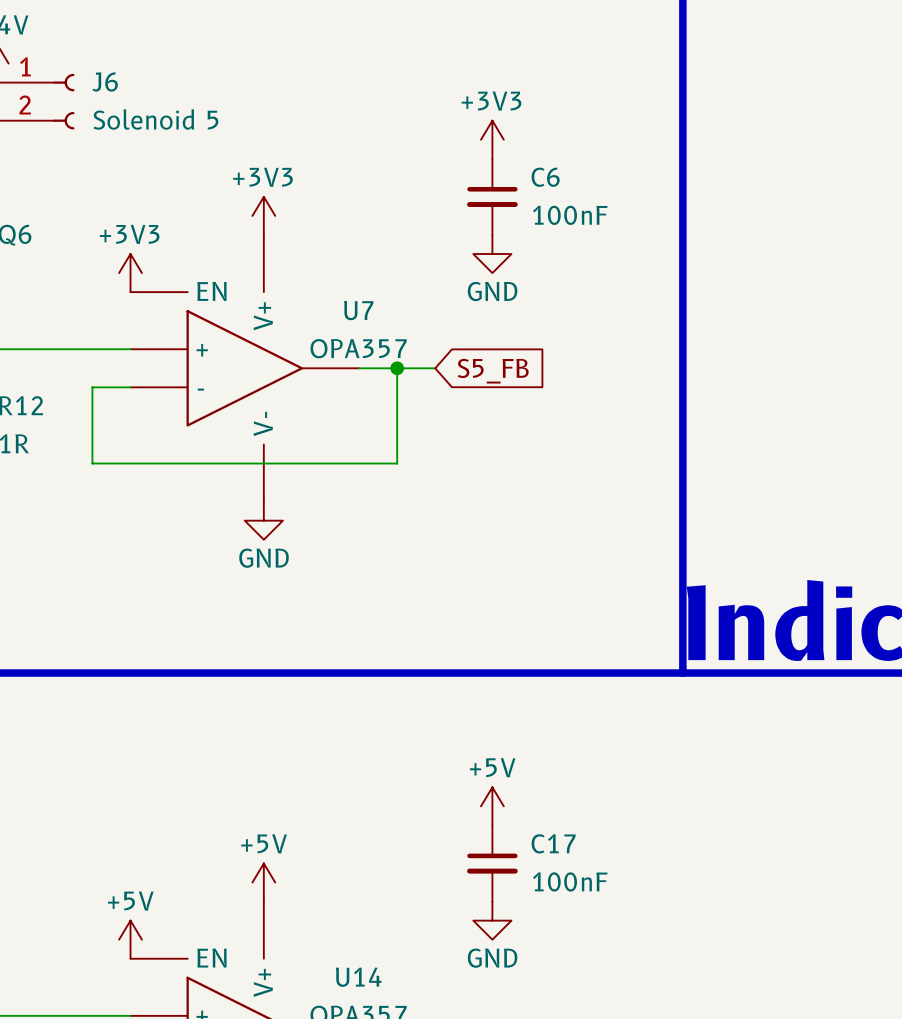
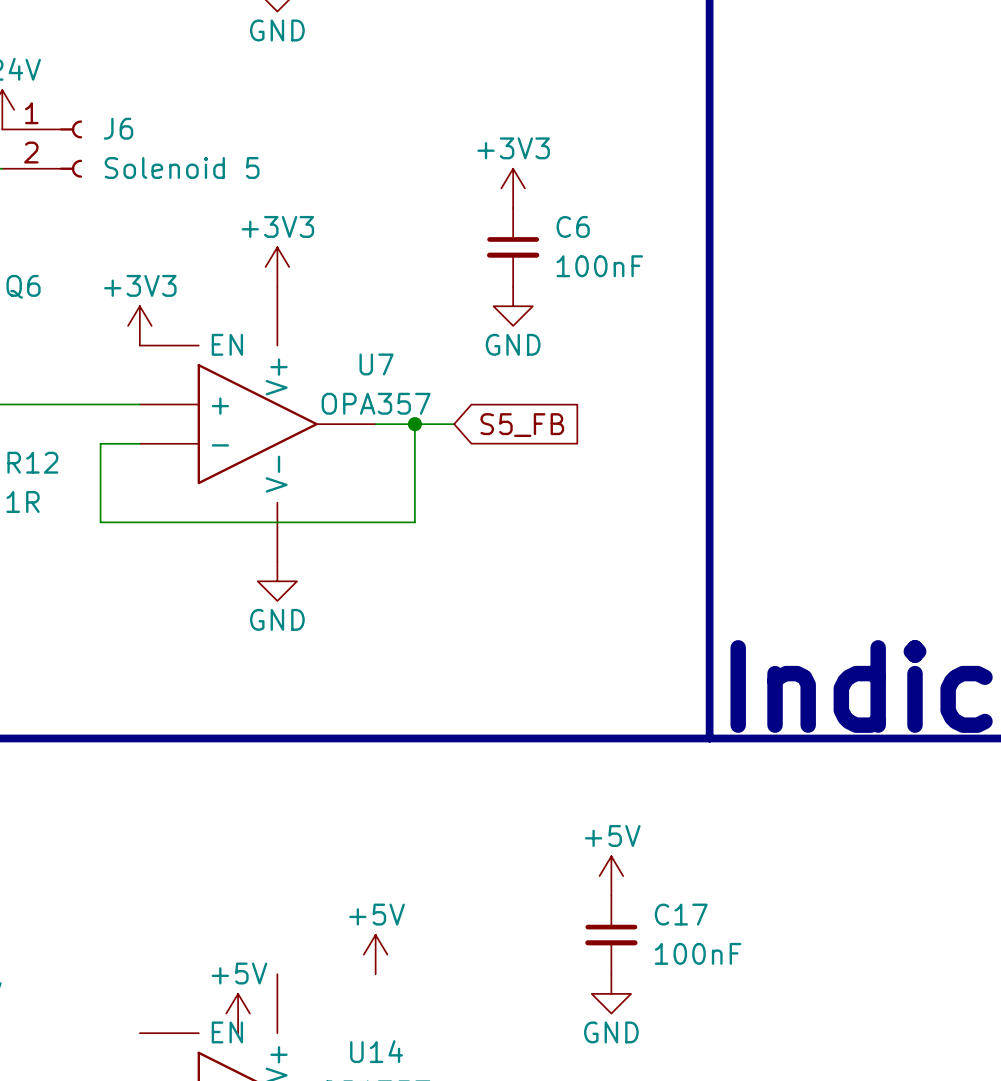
power symbol: +5V (492, 806) -> none
power symbol: none -> +5V (611, 876)
C17 position: (492, 863) -> (611, 934)
power symbol: +5V (263, 882) -> none
power symbol: none -> +5V (375, 954)
power symbol position: GND (492, 920) -> GND (611, 993)
power symbol: +5V (130, 939) -> none
power symbol: none -> +5V (238, 1013)

